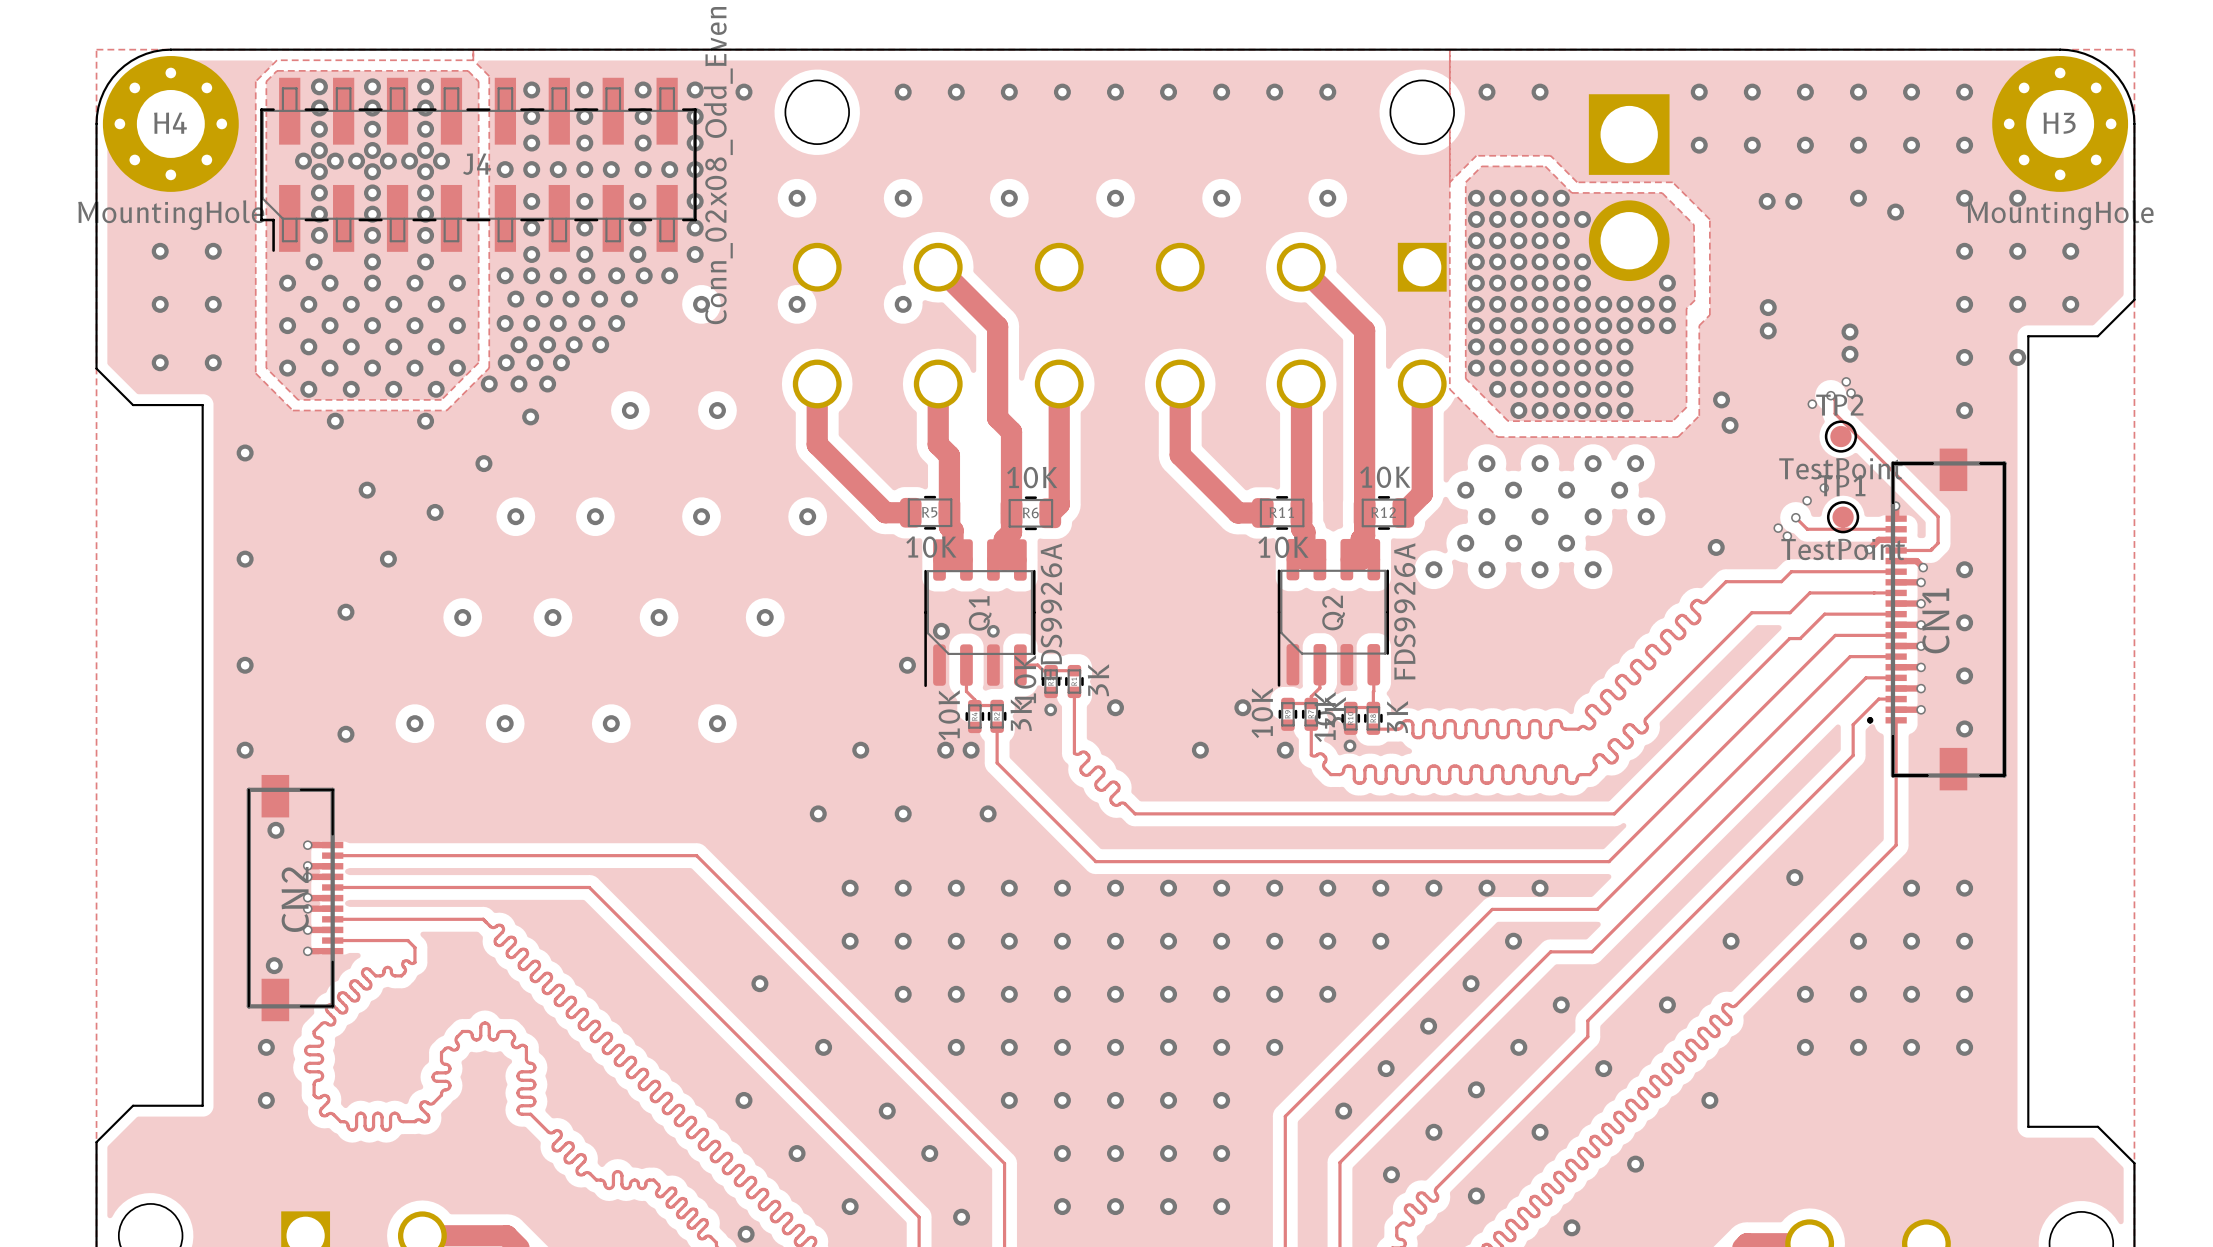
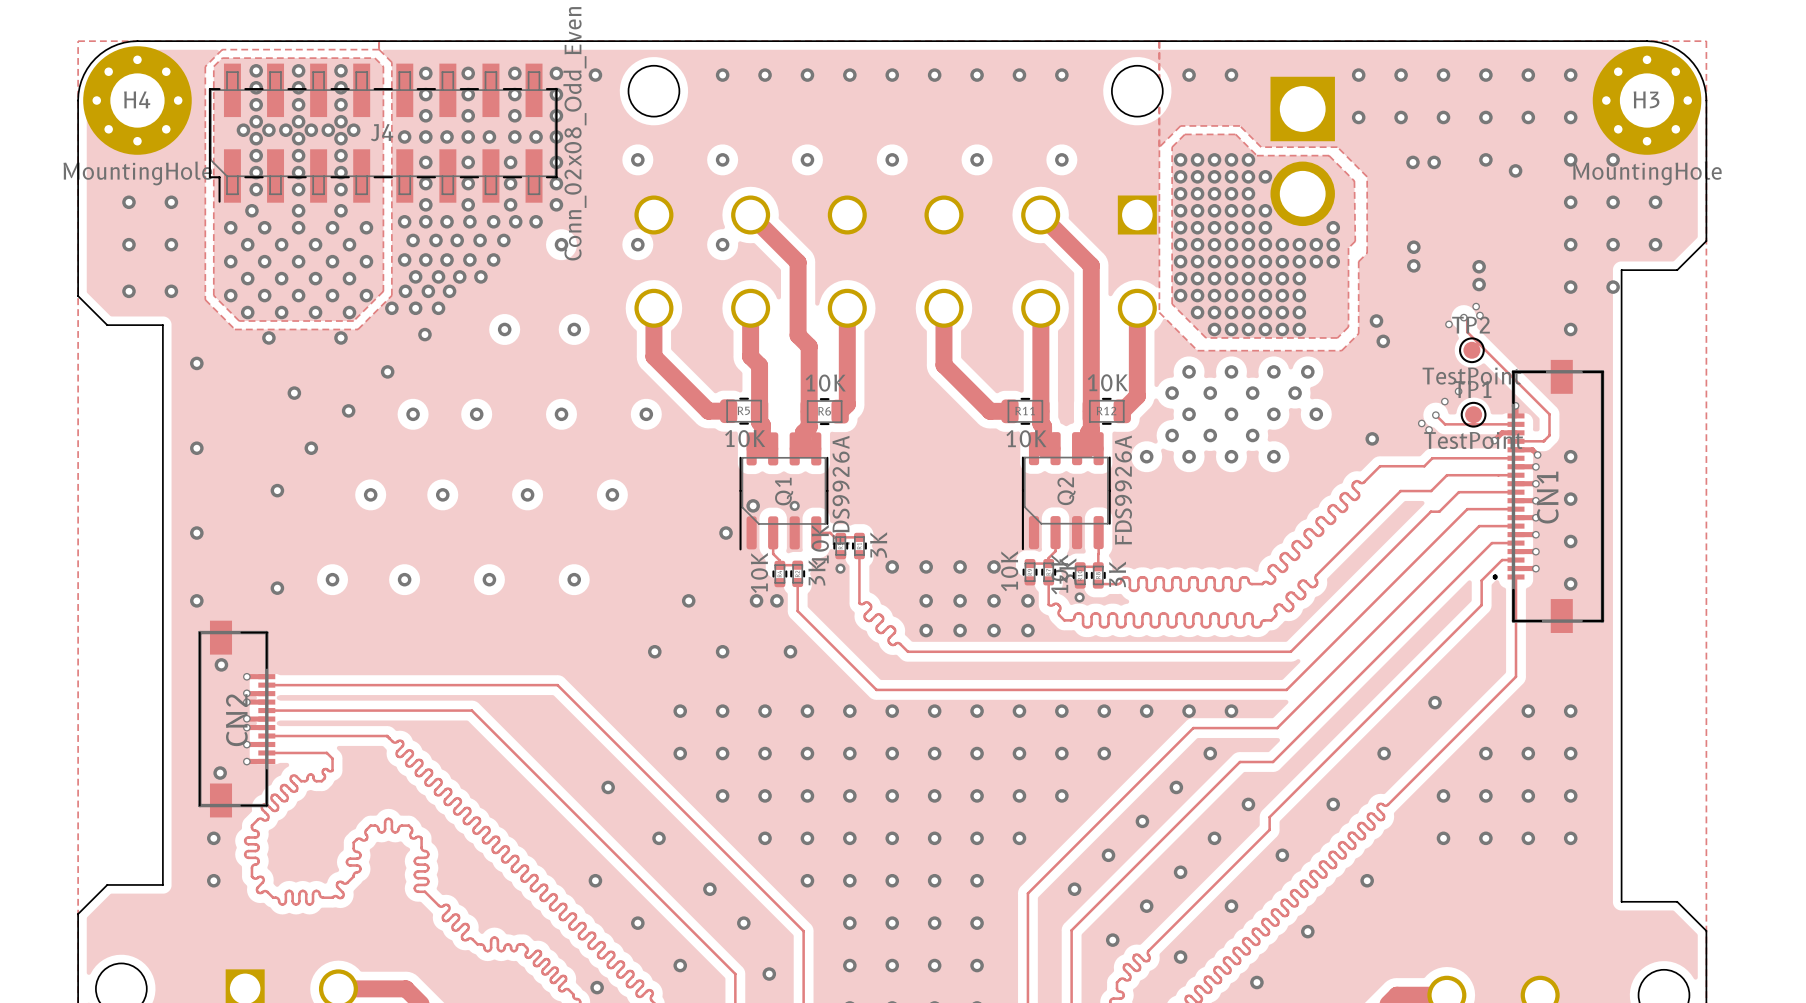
via: none -> (926, 566)
via: none -> (960, 566)
via: none -> (926, 600)
via: none -> (994, 600)
via: none -> (926, 630)
via: none -> (960, 630)
via: none -> (994, 630)
via: none -> (1027, 630)

